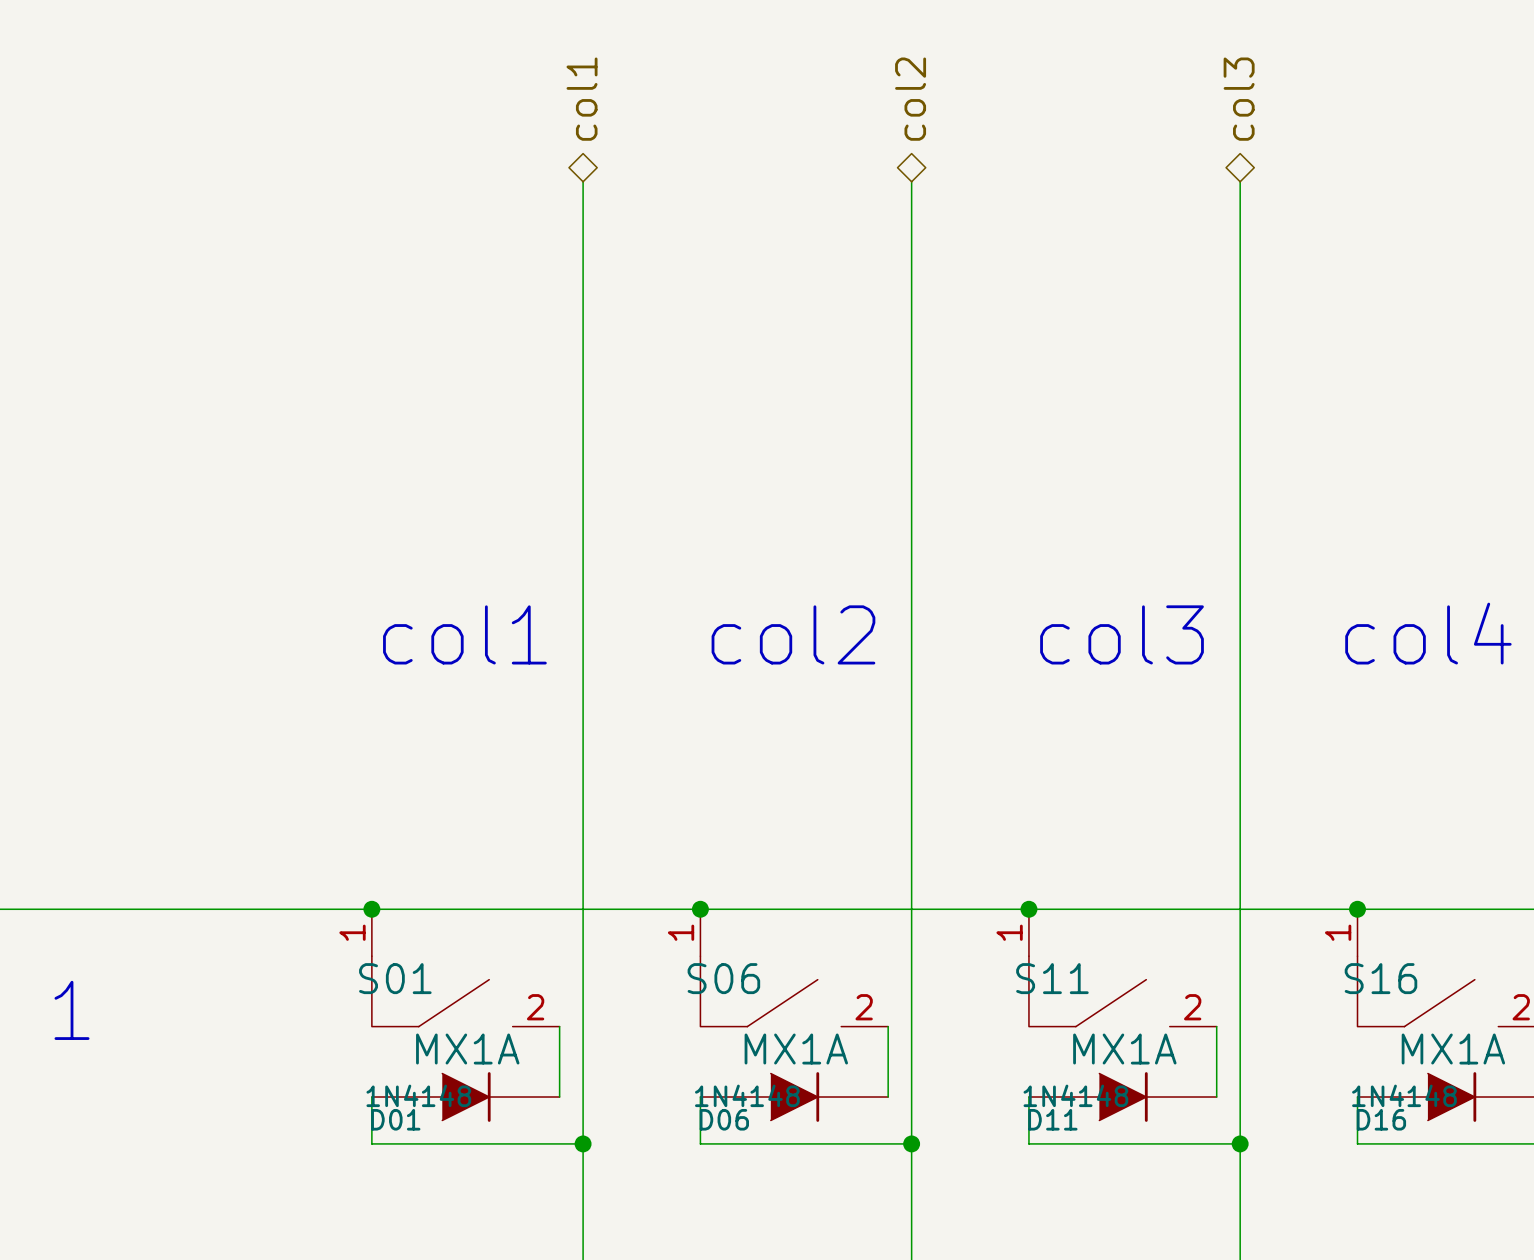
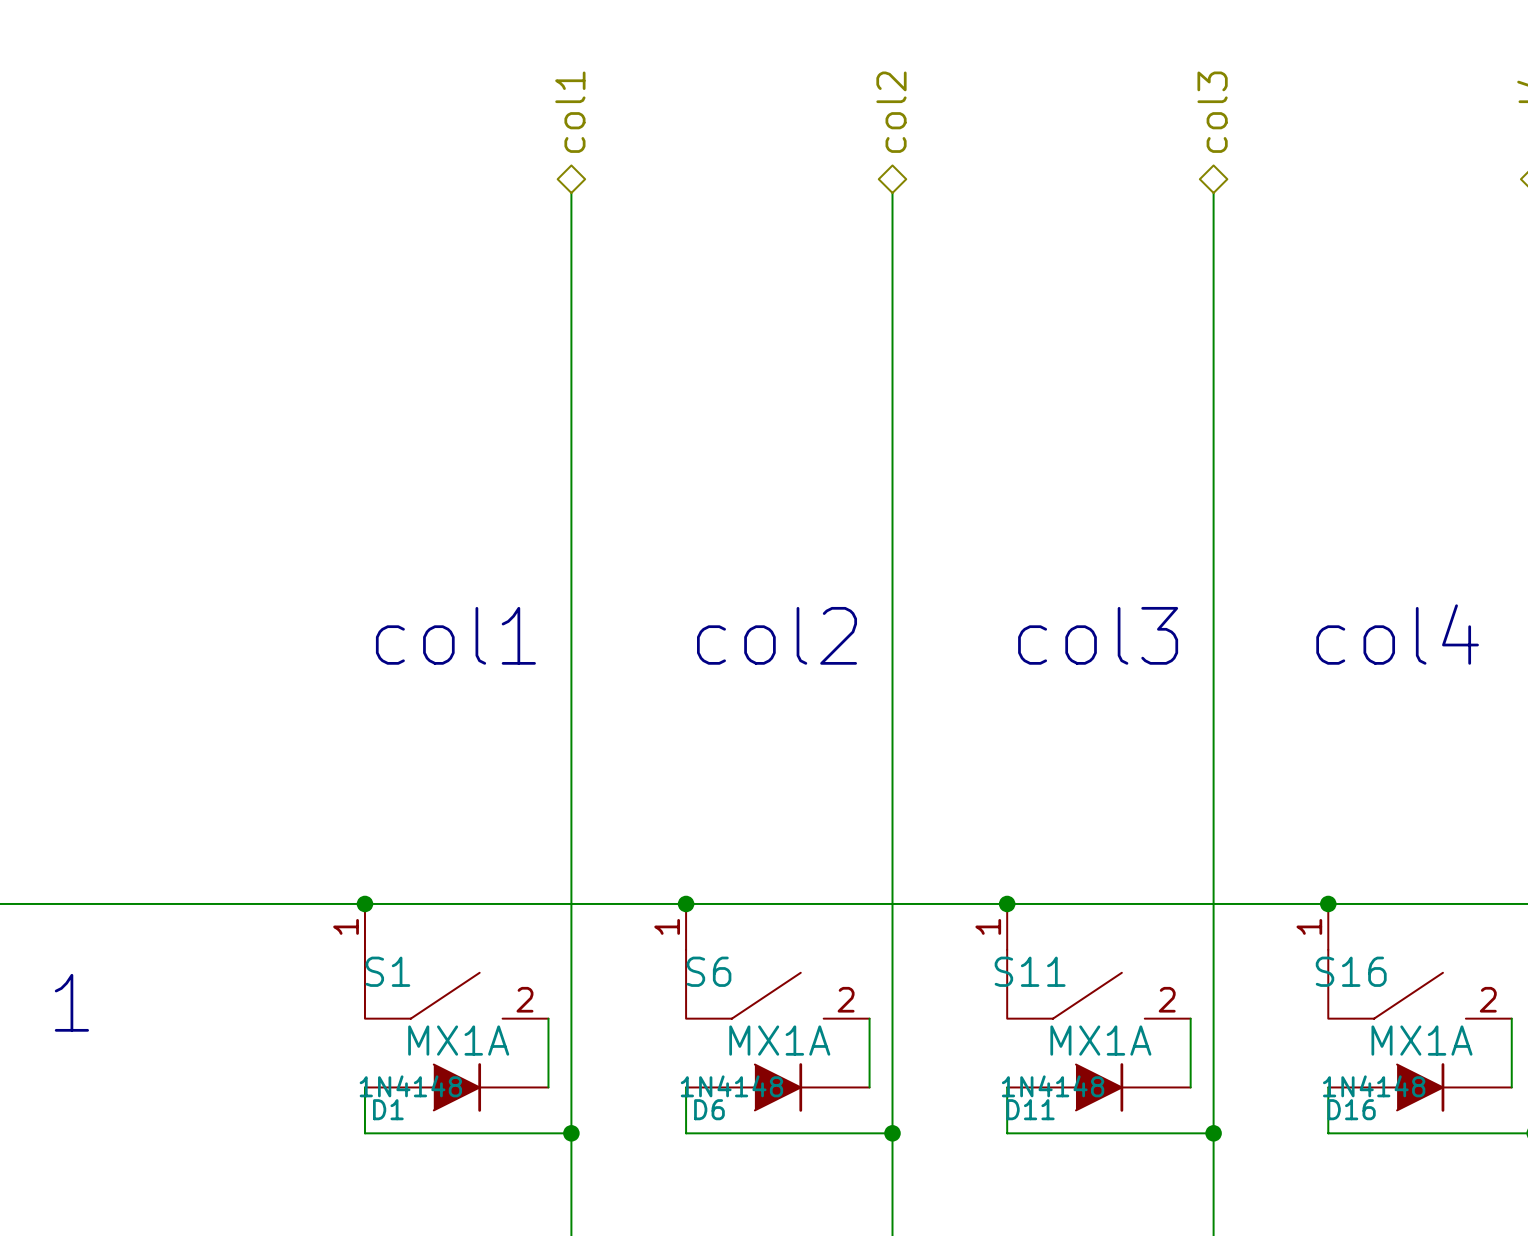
S01 name: S01 (395, 978) -> S1 (387, 971)
S06 name: S06 (723, 978) -> S6 (709, 971)
D01 name: D01 (395, 1119) -> D1 (388, 1109)
D06 name: D06 (724, 1119) -> D6 (709, 1109)

